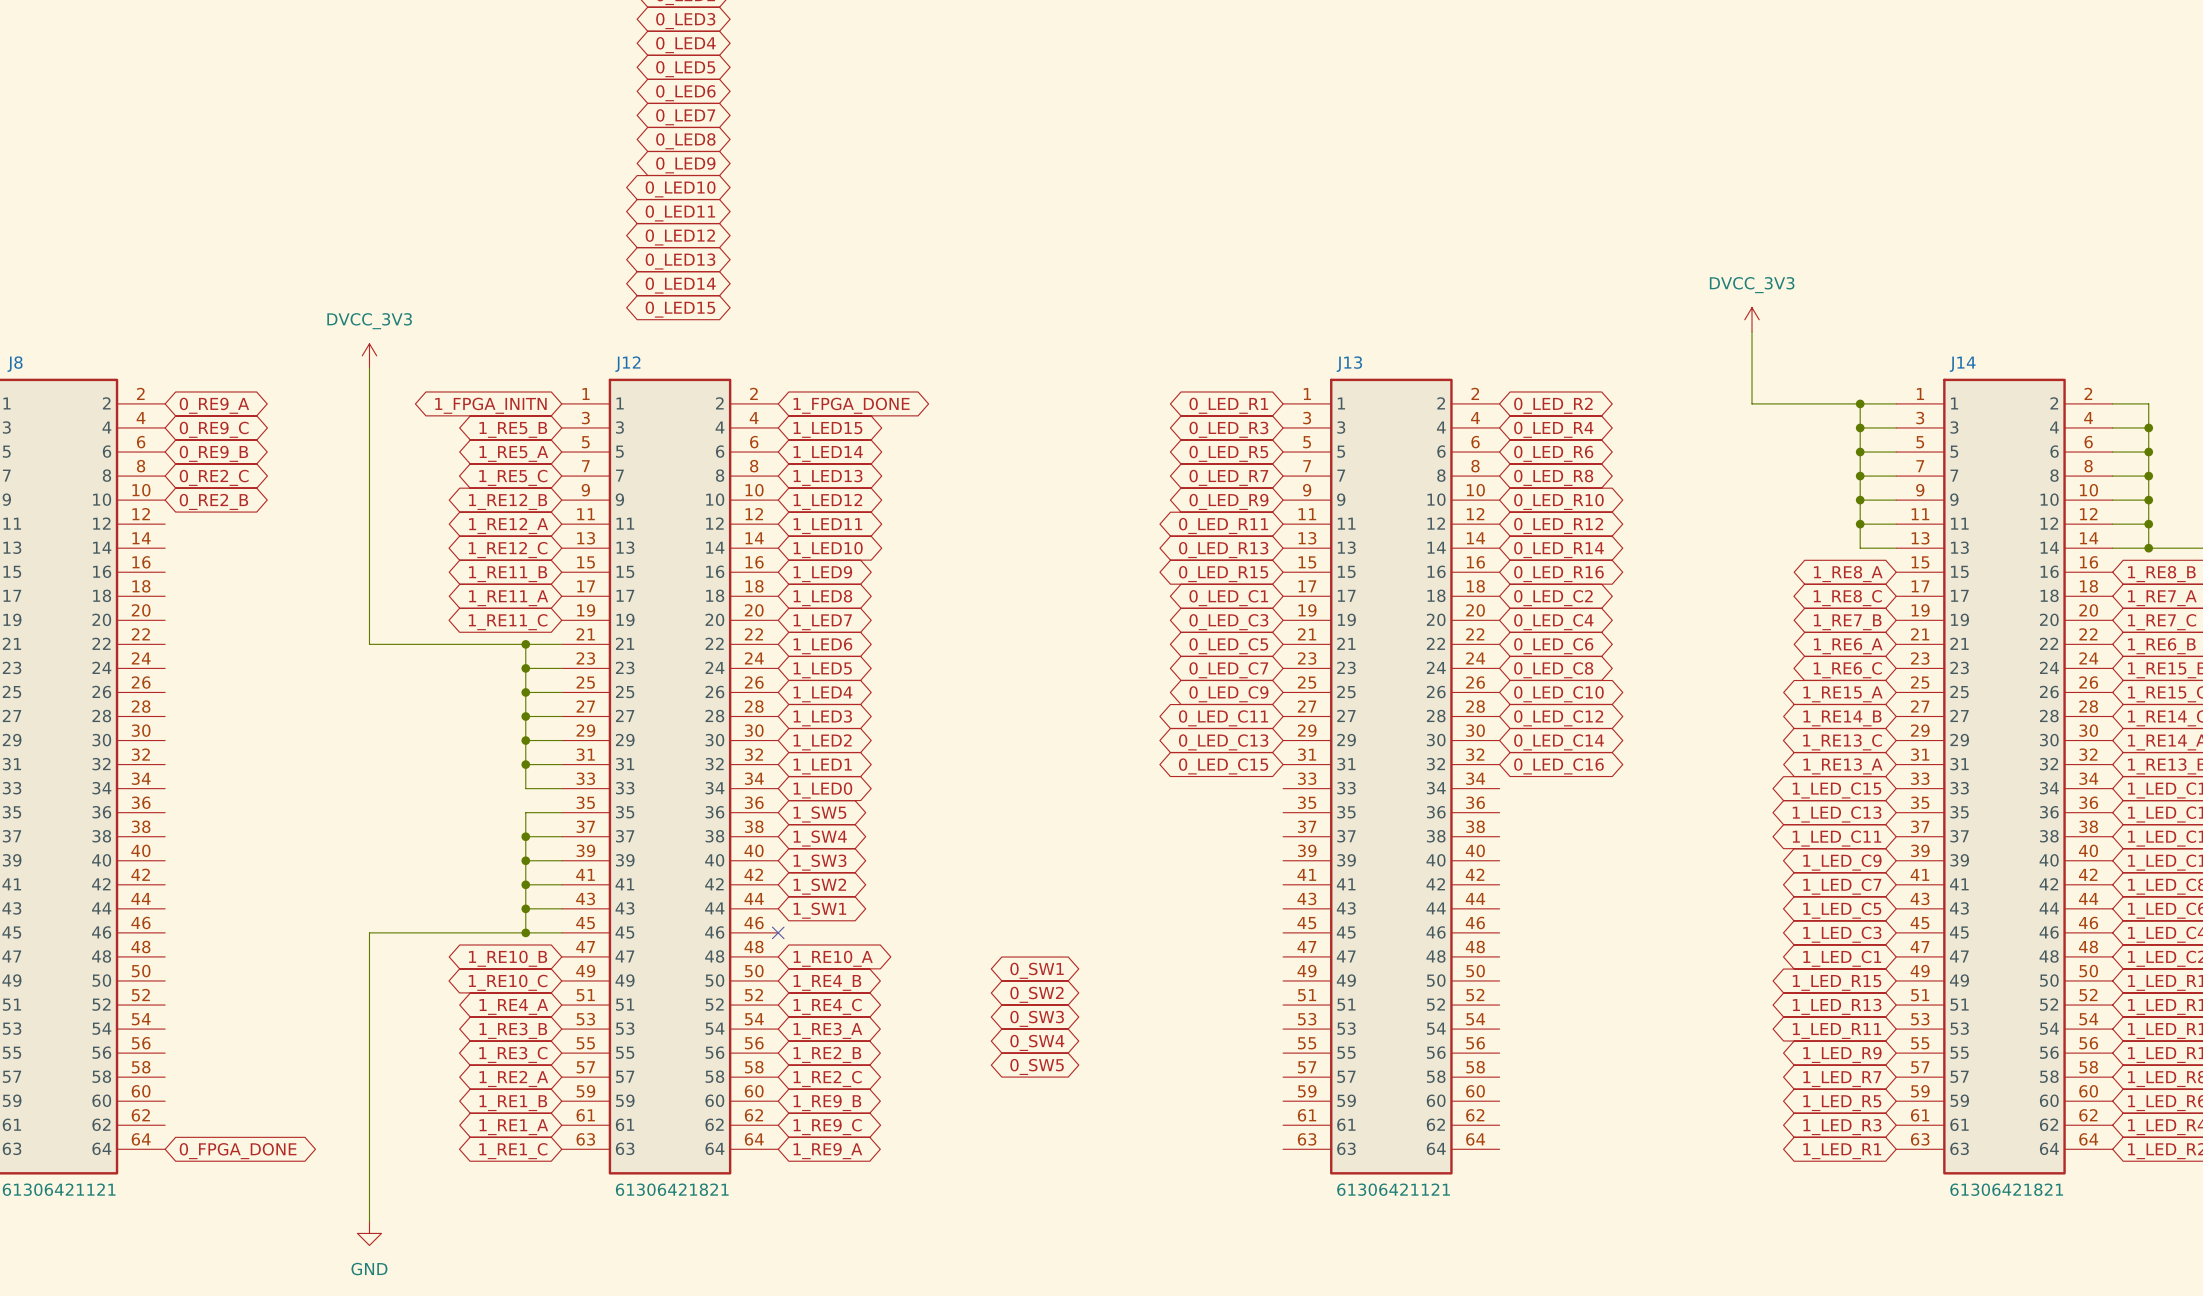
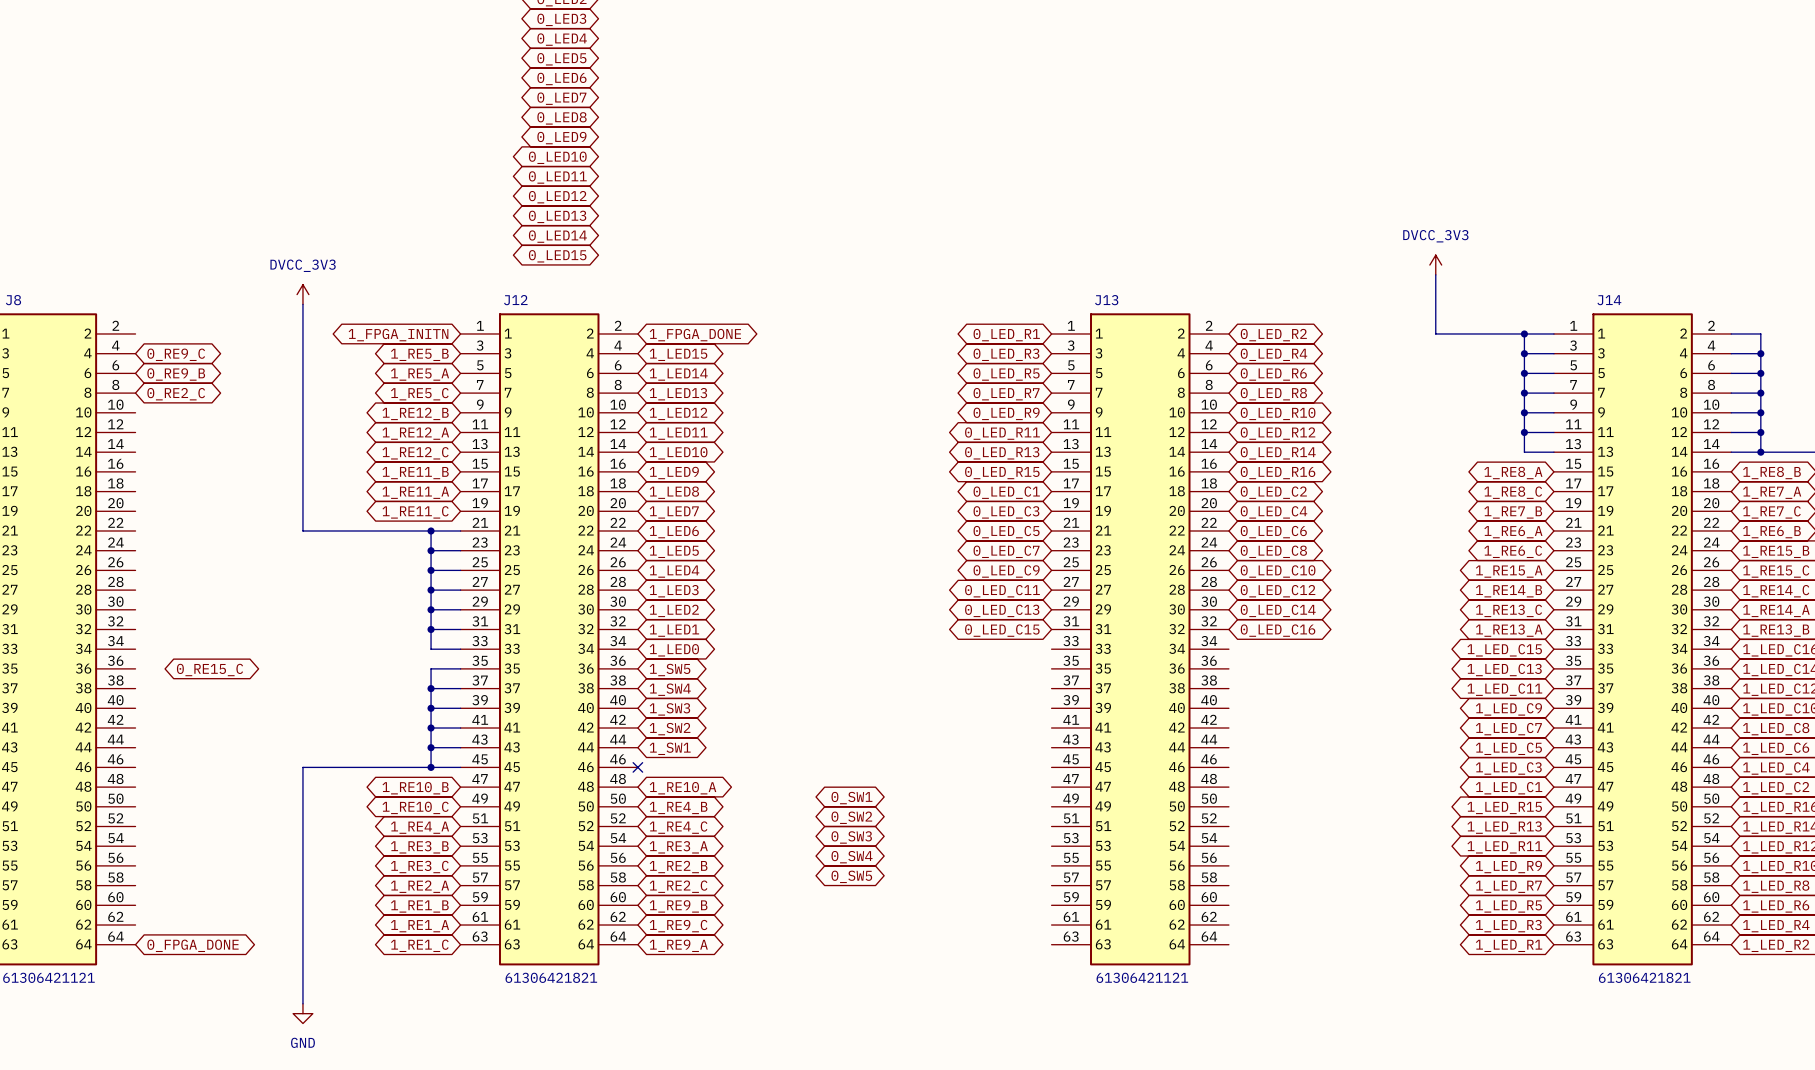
global label: 0_RE9_A (214, 405) -> none
global label: 0_RE2_B (213, 501) -> none
global label: none -> 0_RE15_C (209, 670)

